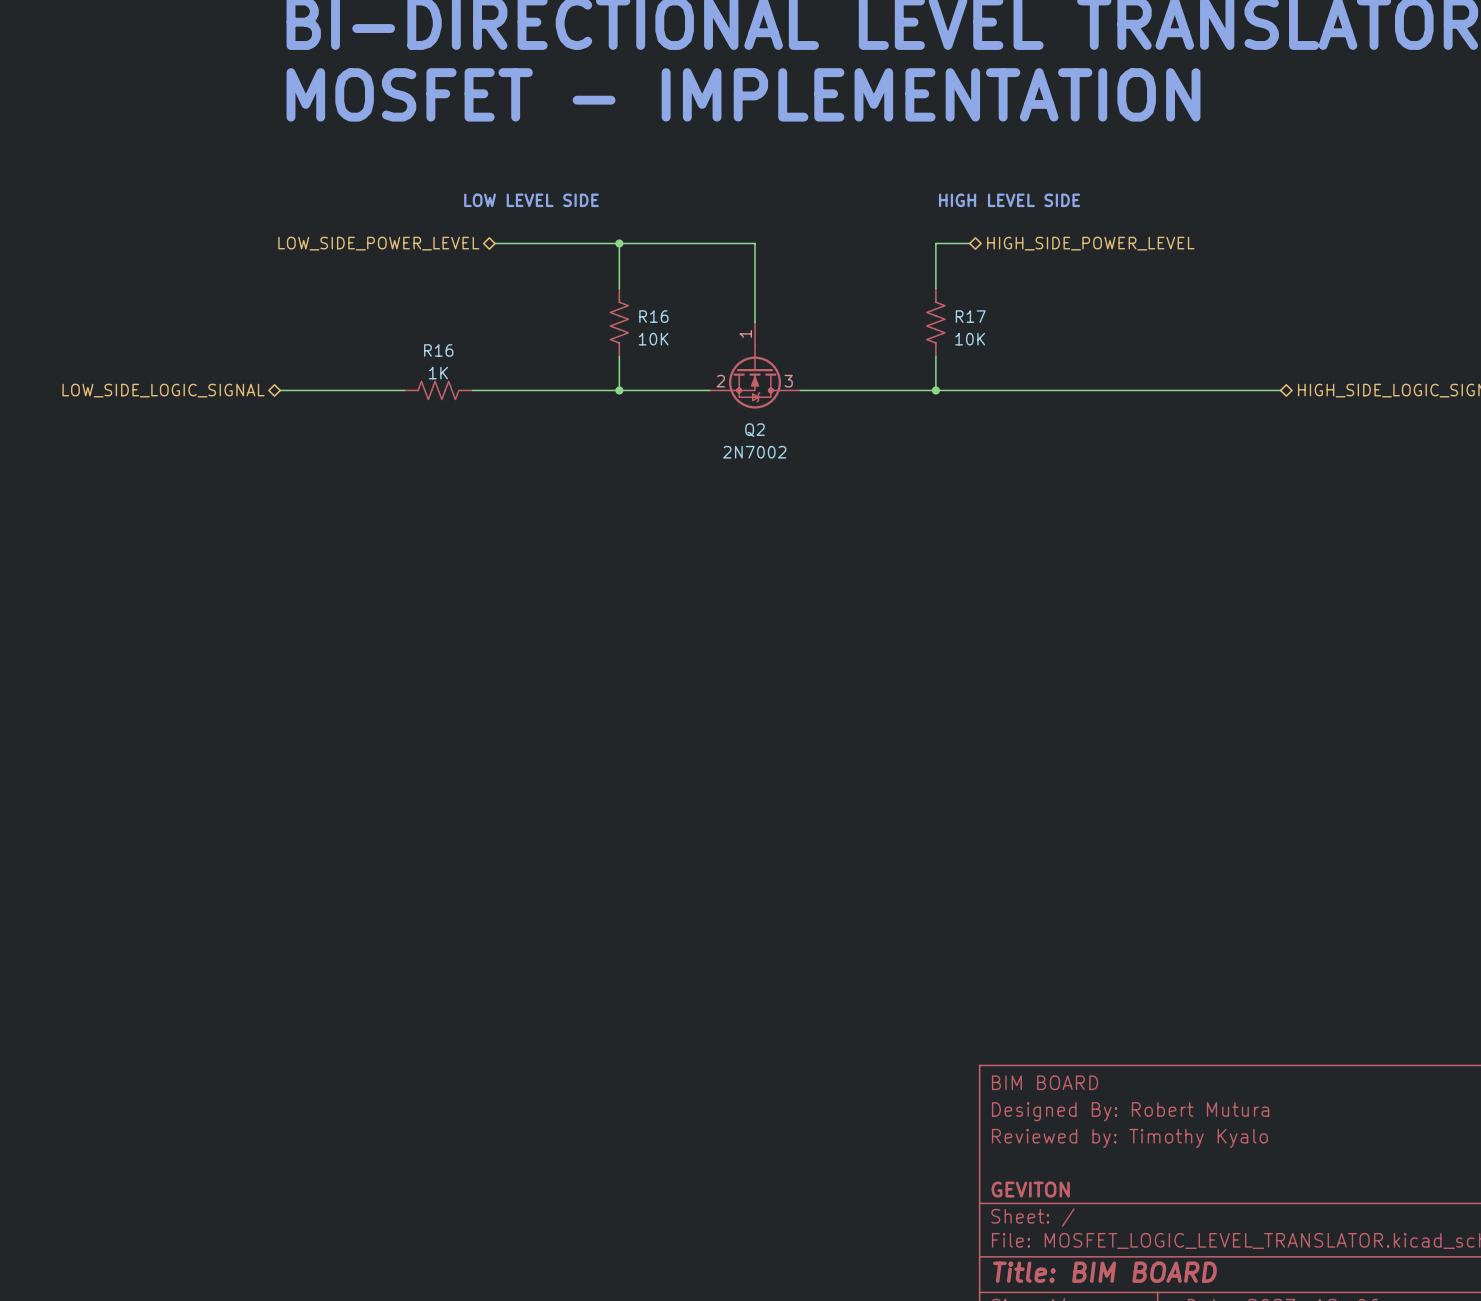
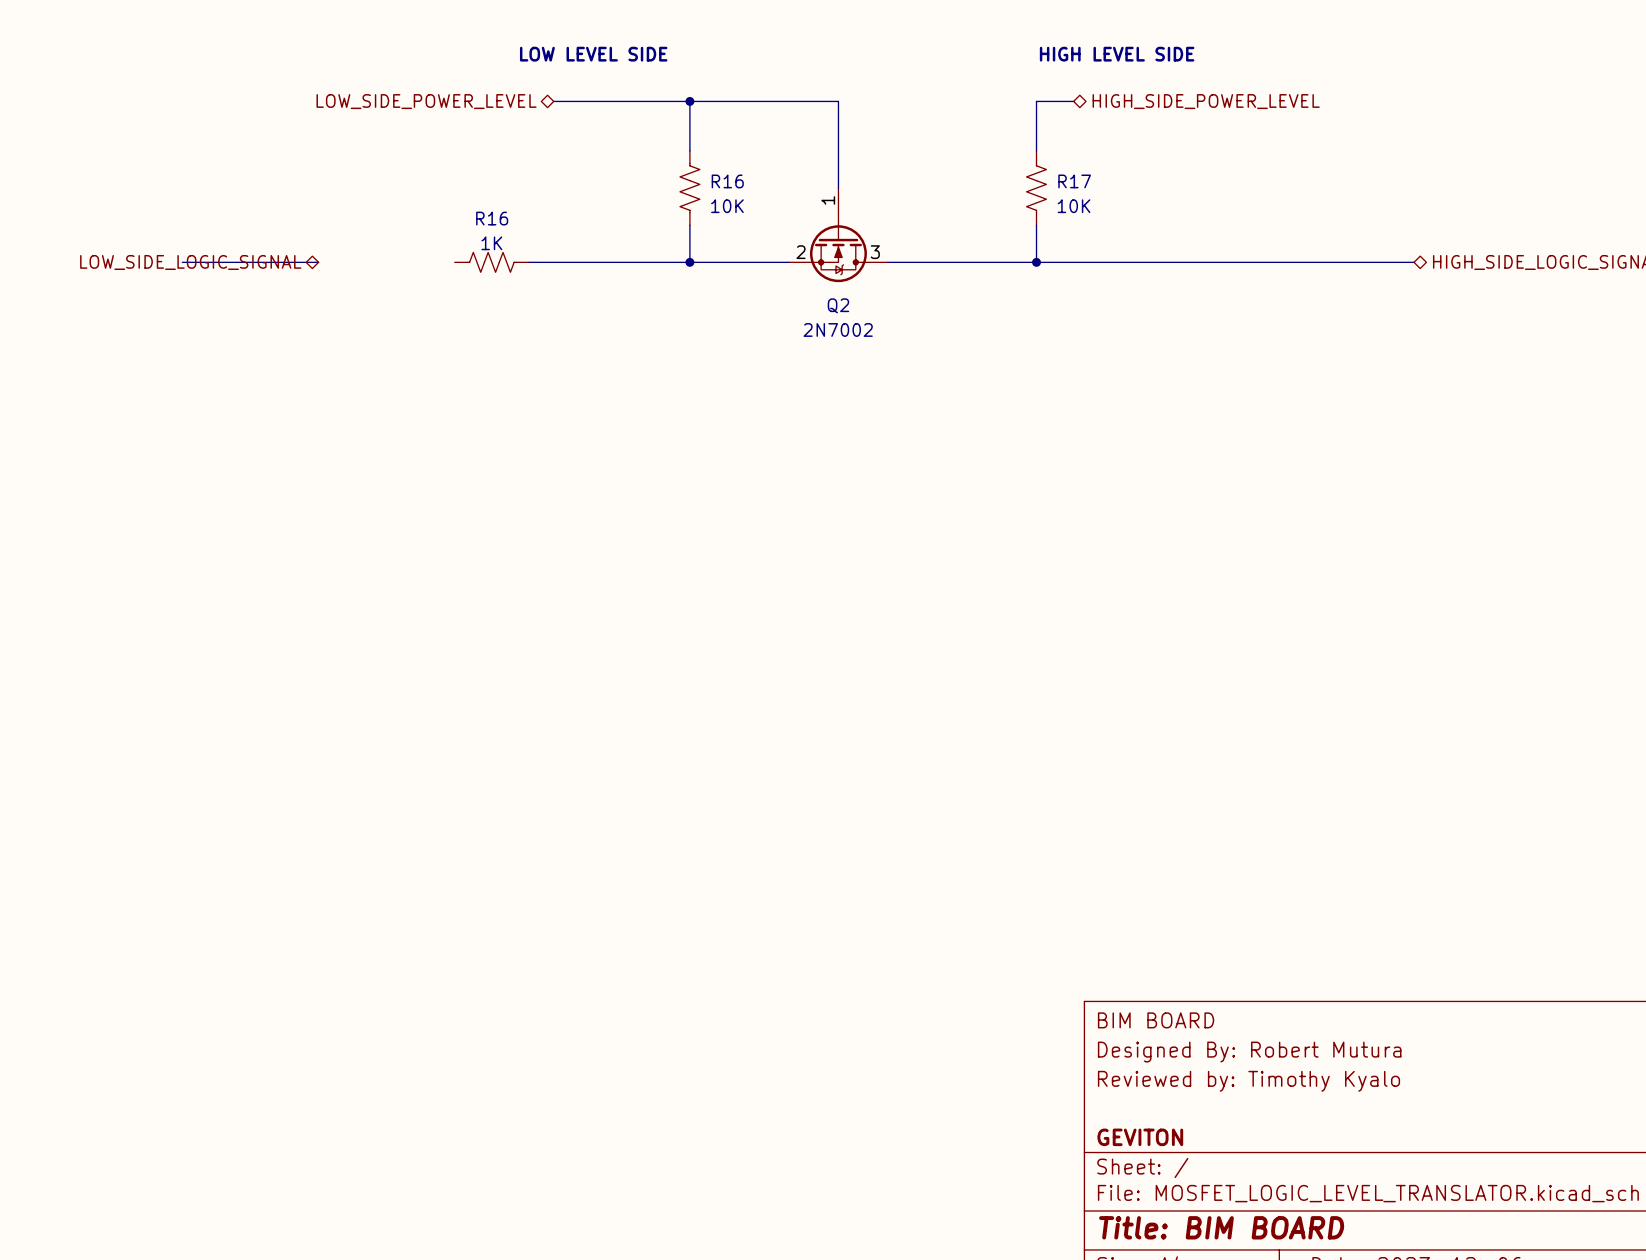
wire: (280, 390) (404, 390) -> (318, 262) (182, 262)

